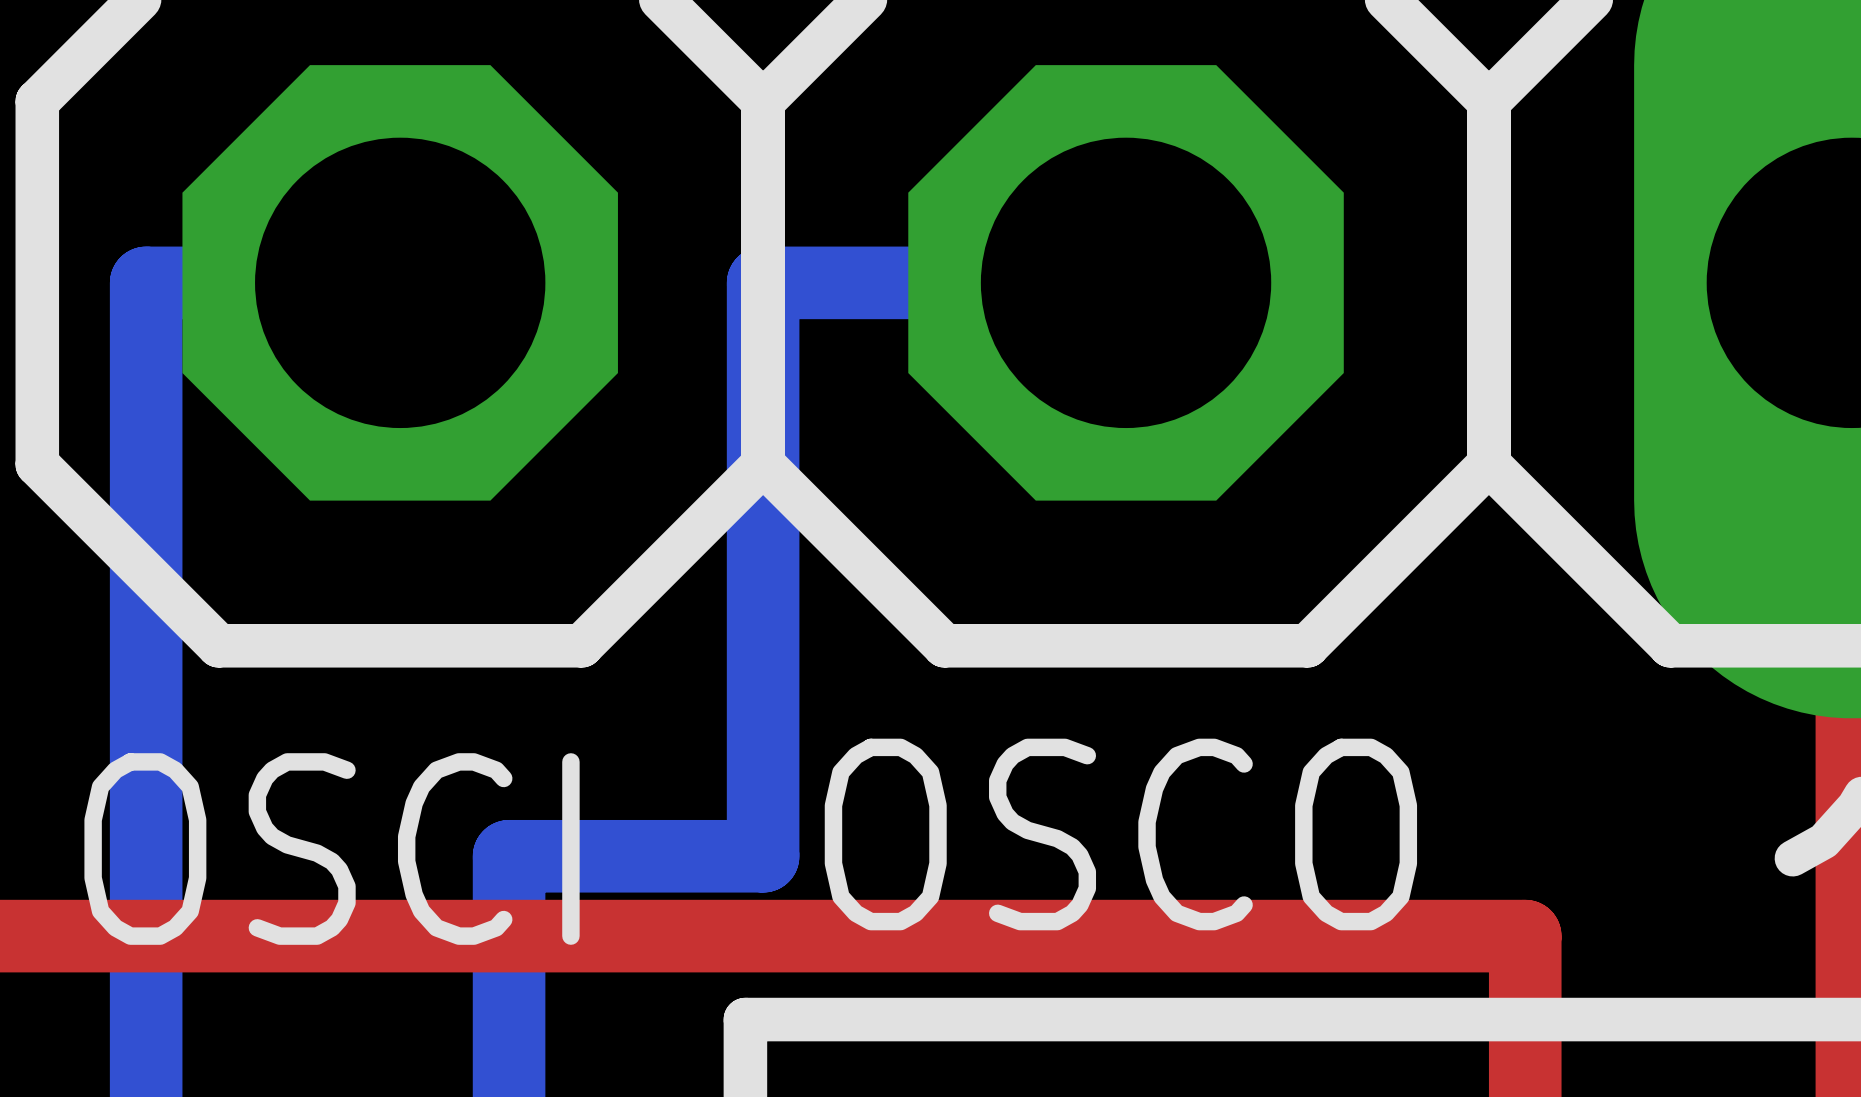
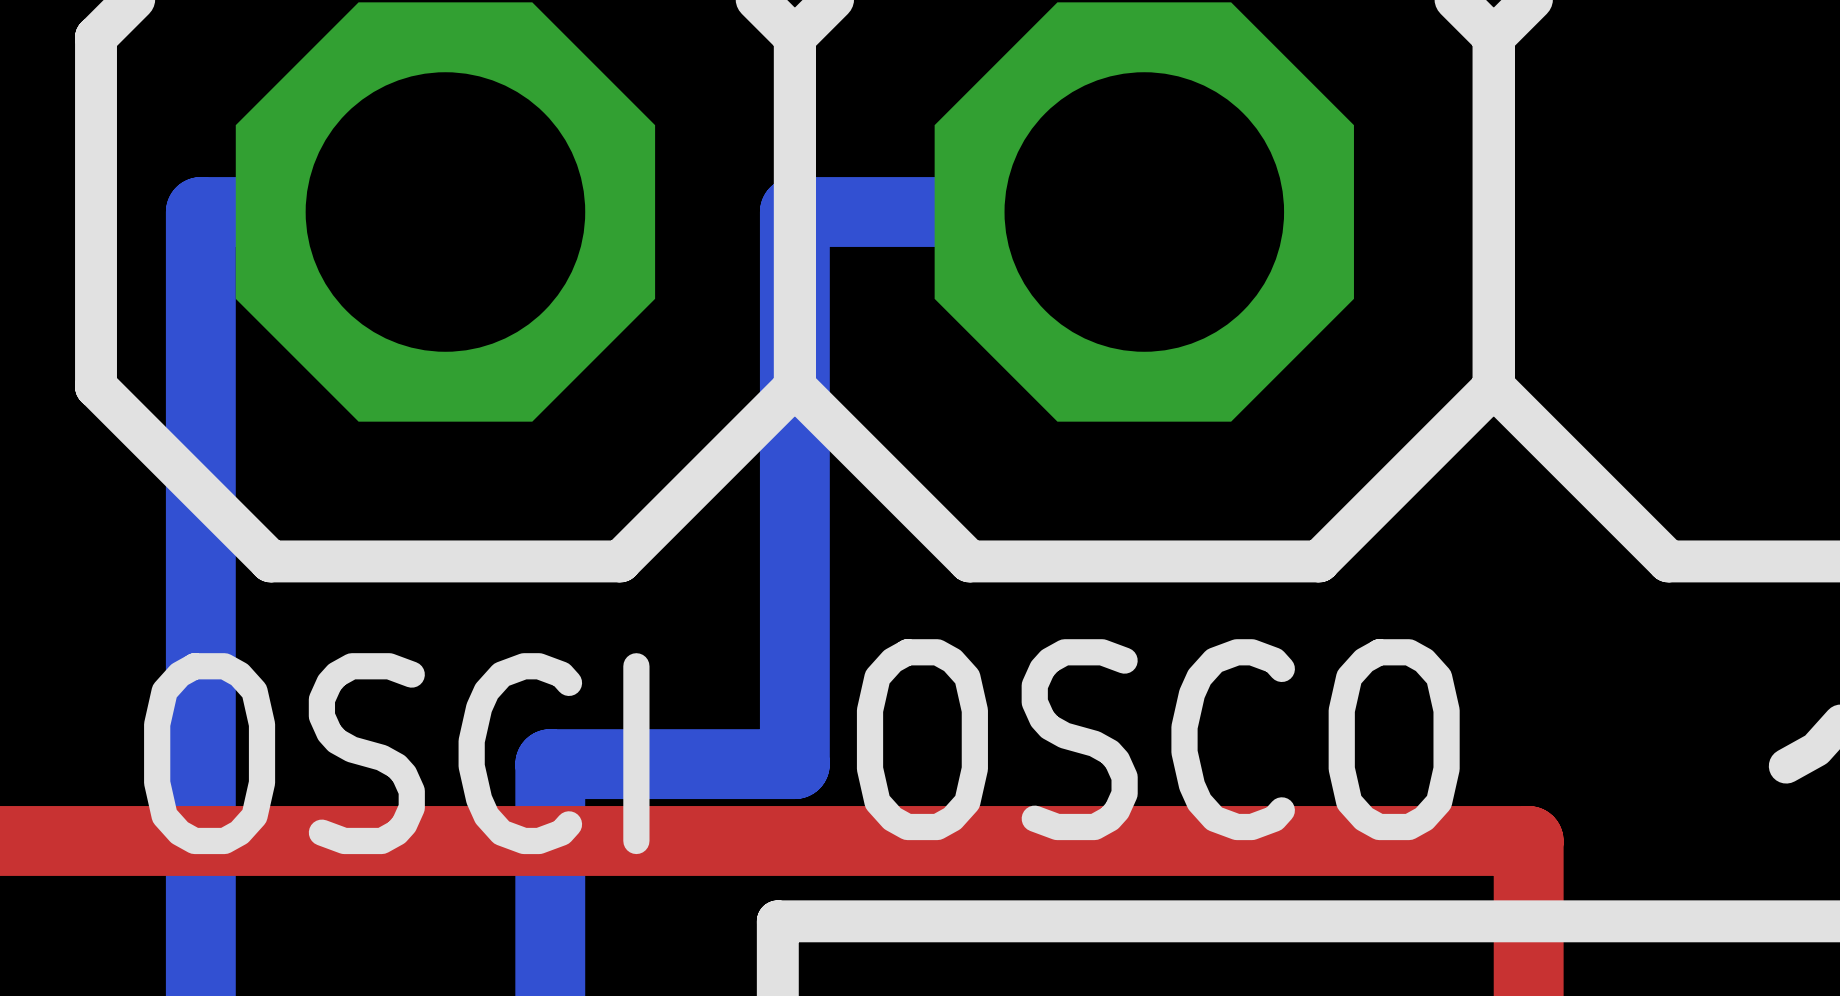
OSCO name position: OSCO (1120, 834) -> OSCO (1158, 739)
OSCI name position: OSCI (332, 849) -> OSCI (396, 753)

